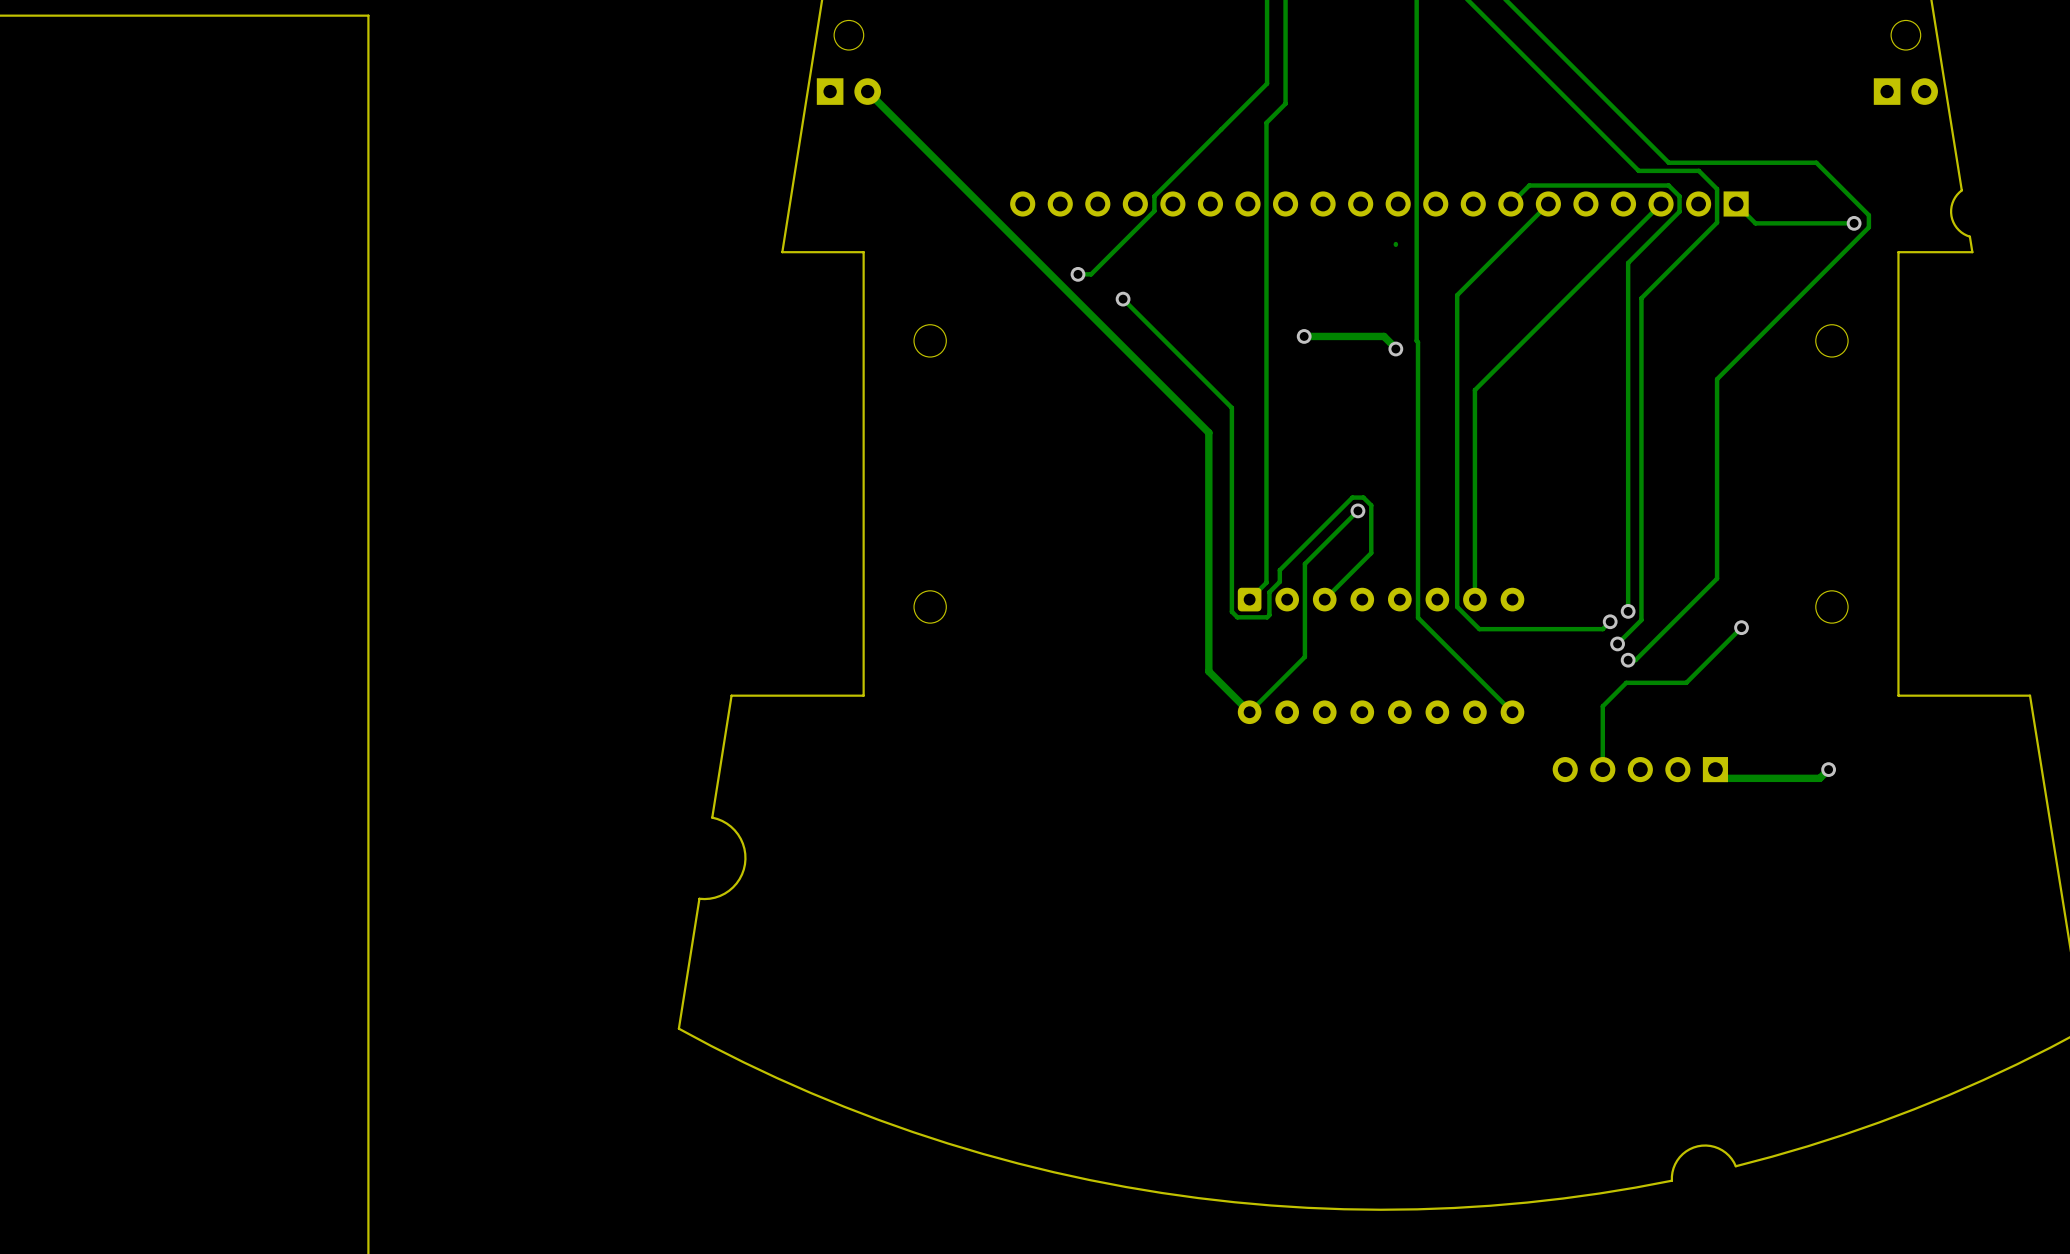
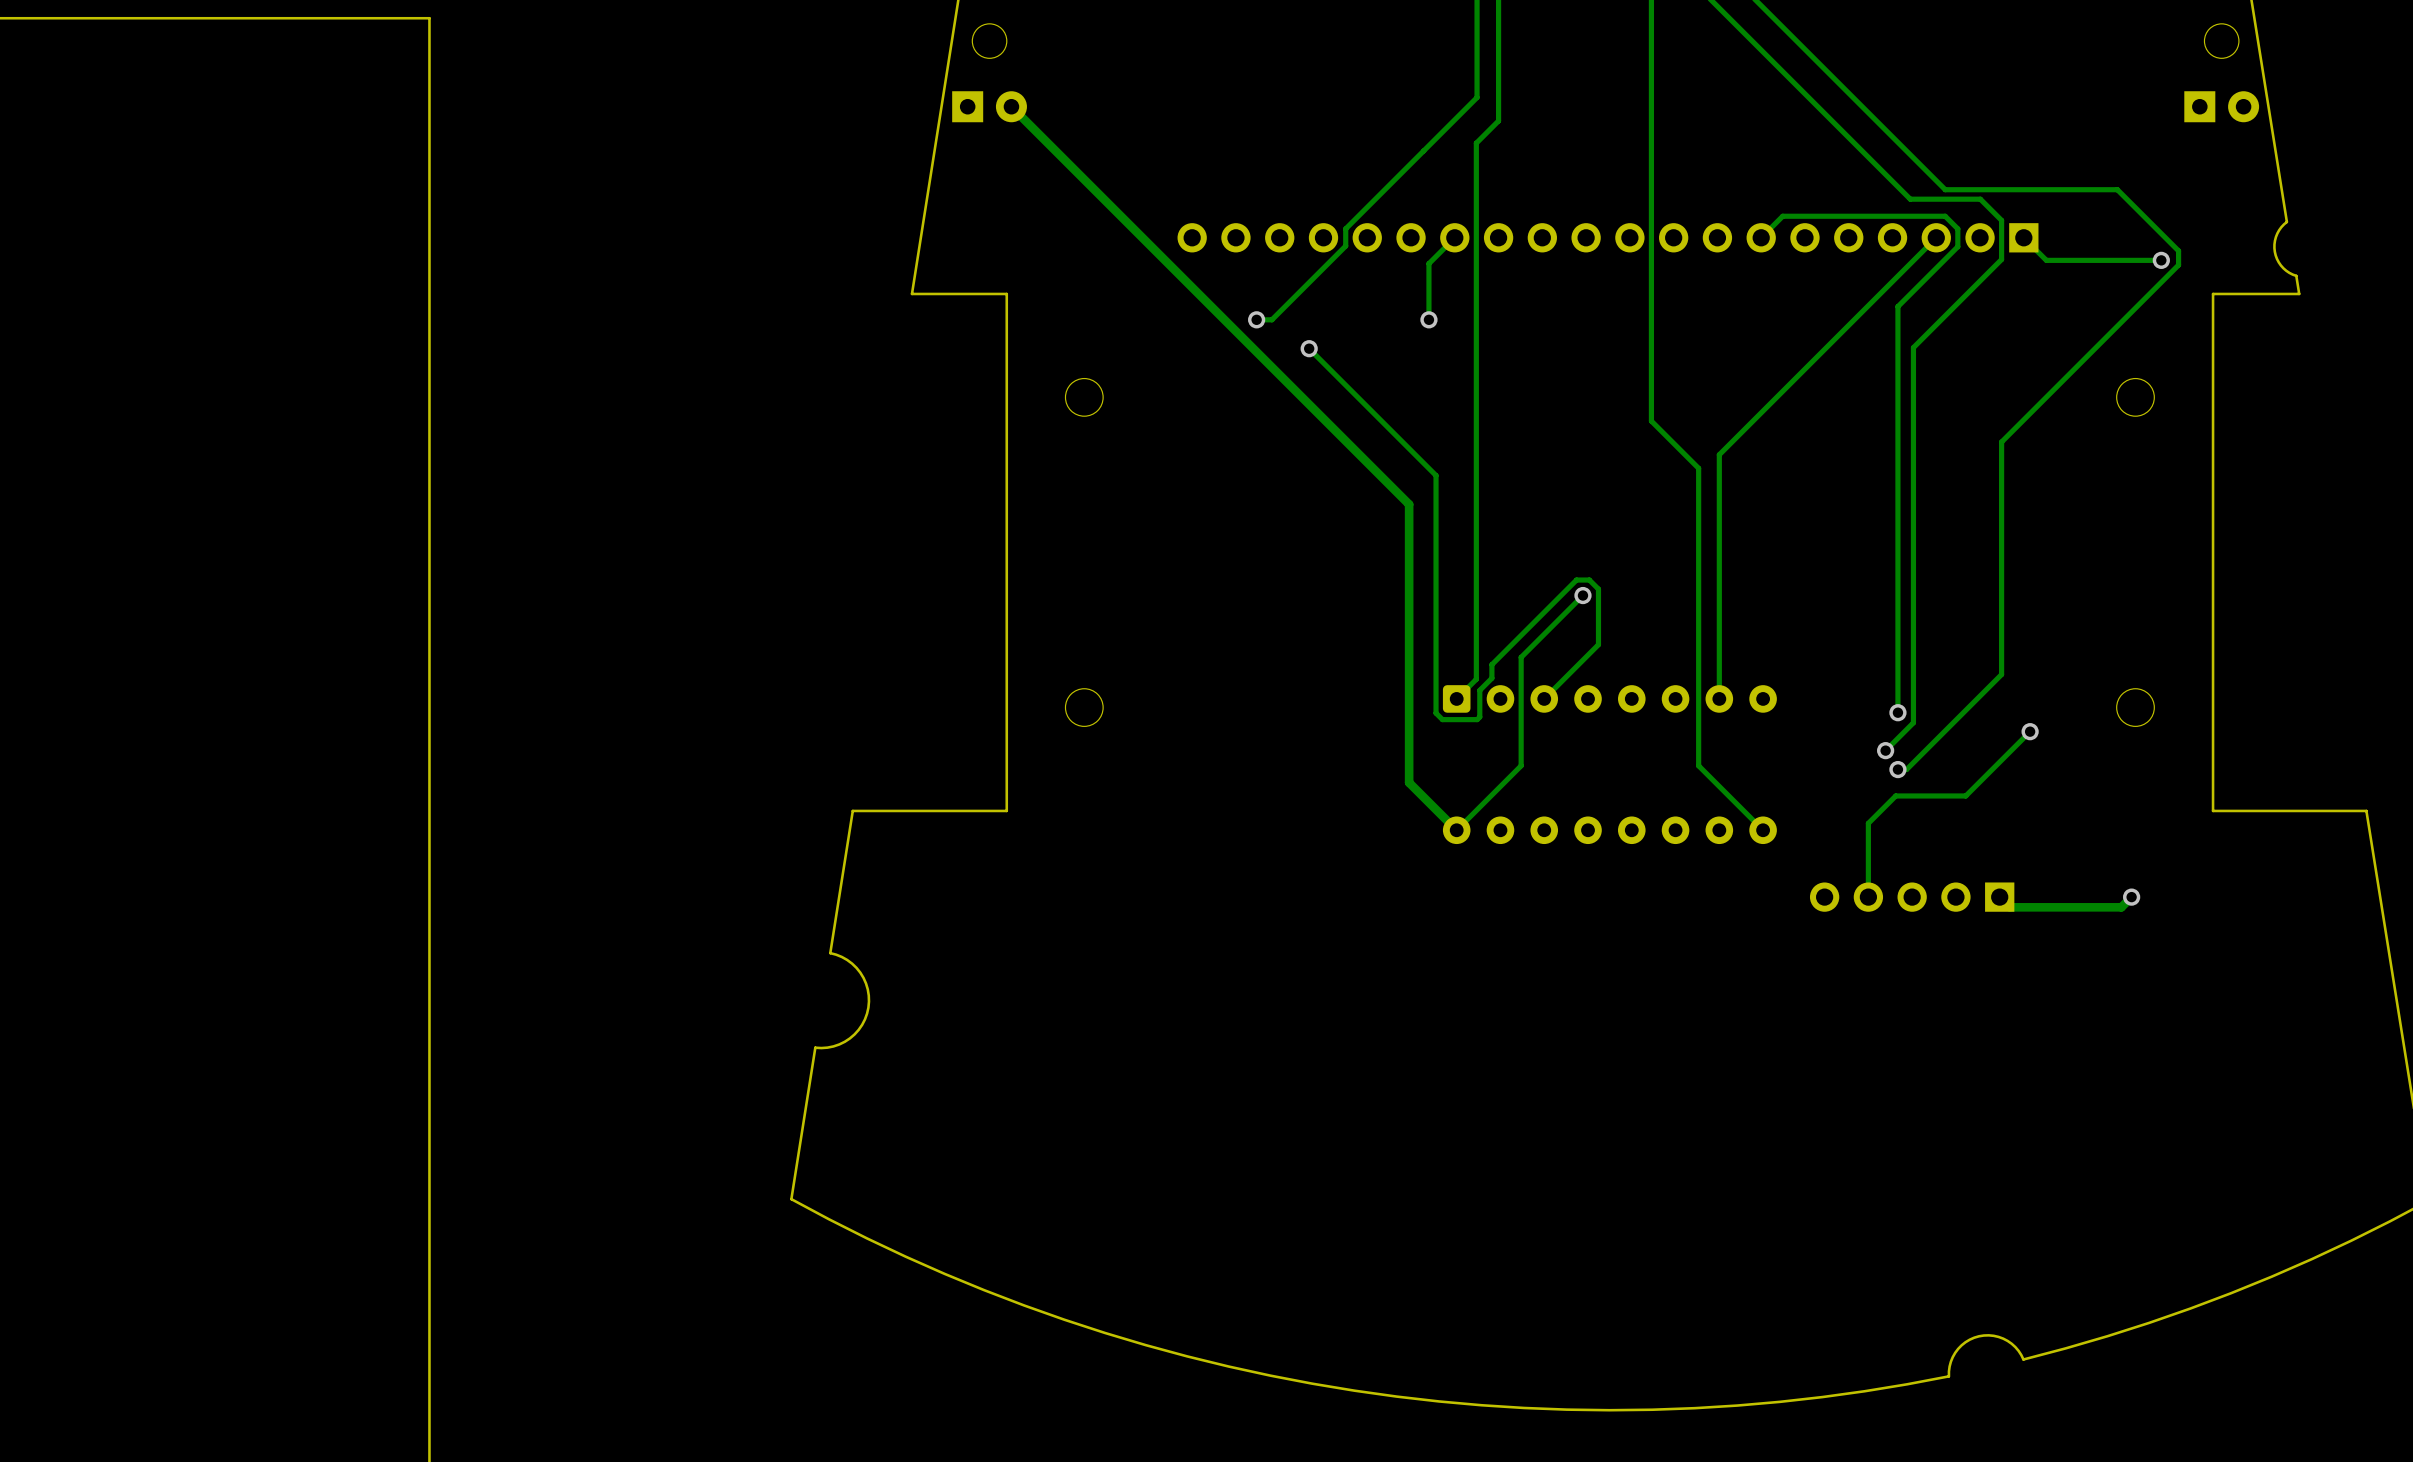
track: none -> (1454, 237) (1428, 263) (1428, 319)
track: (1548, 203) (1457, 295) (1457, 401) -> (1651, 397) (1651, 421) (1698, 468)
track: (1395, 244) (1395, 244) -> none
via: none -> (1428, 319)
track: (1304, 336) (1384, 336) (1395, 349) -> none
via: (1304, 336) -> none
track: (1416, 340) (1418, 617) (1457, 656) -> none
via: (1395, 349) -> none
track: (1457, 606) (1479, 629) (1602, 629) (1610, 621) -> (1698, 707) (1698, 765)
via: (1610, 621) -> none

